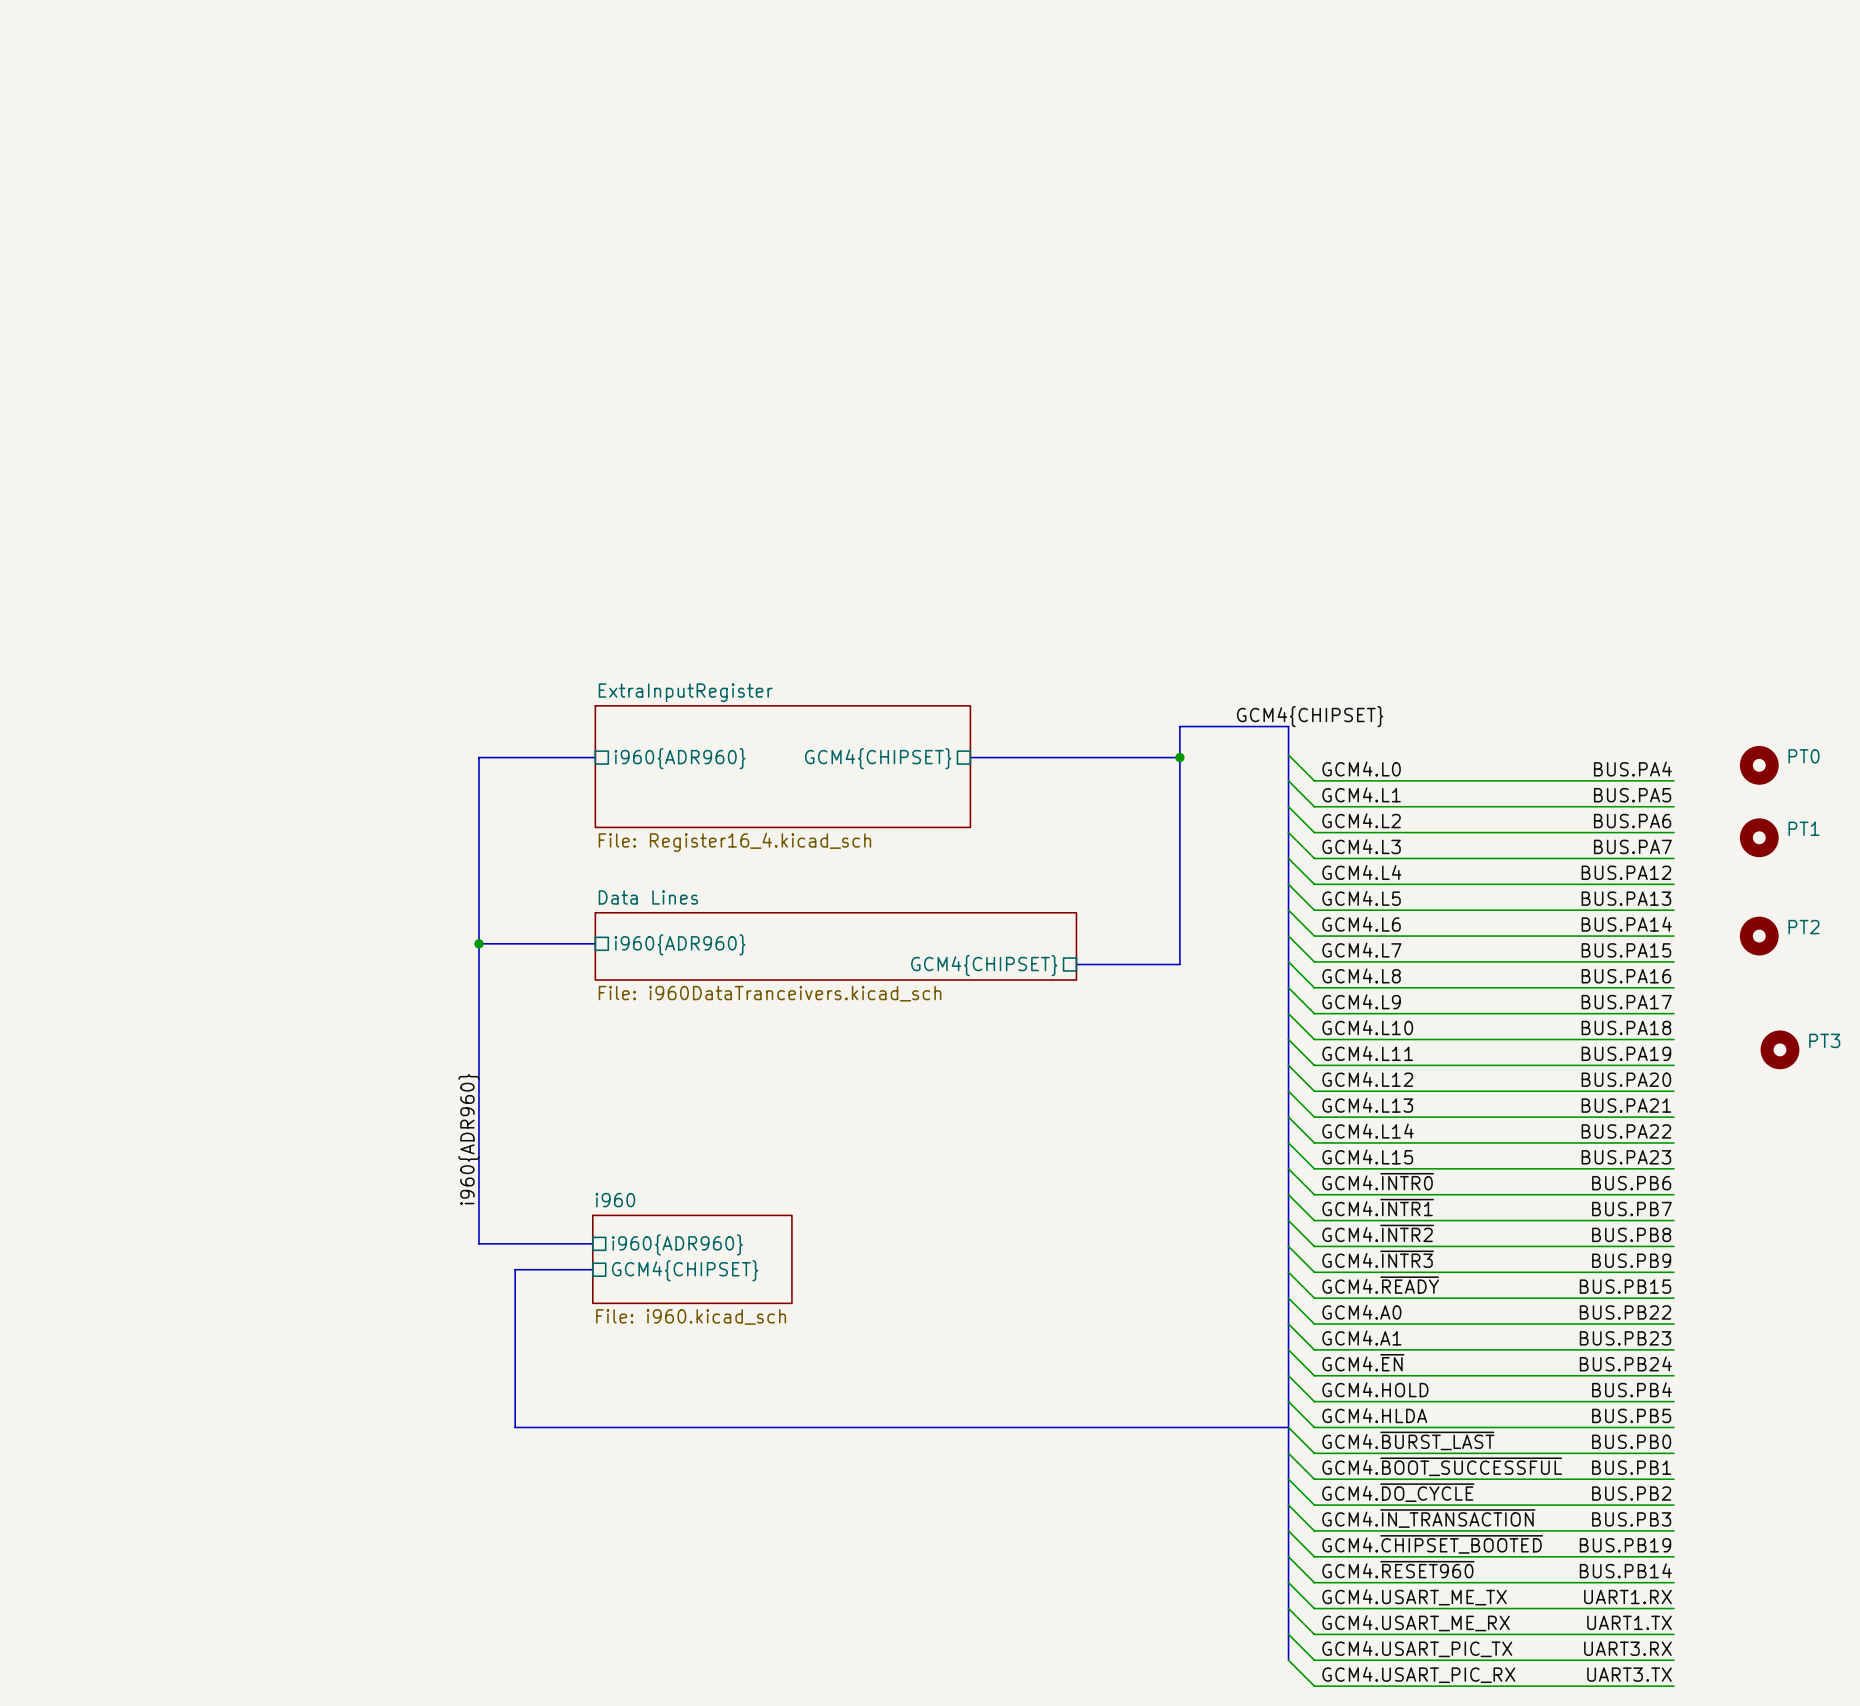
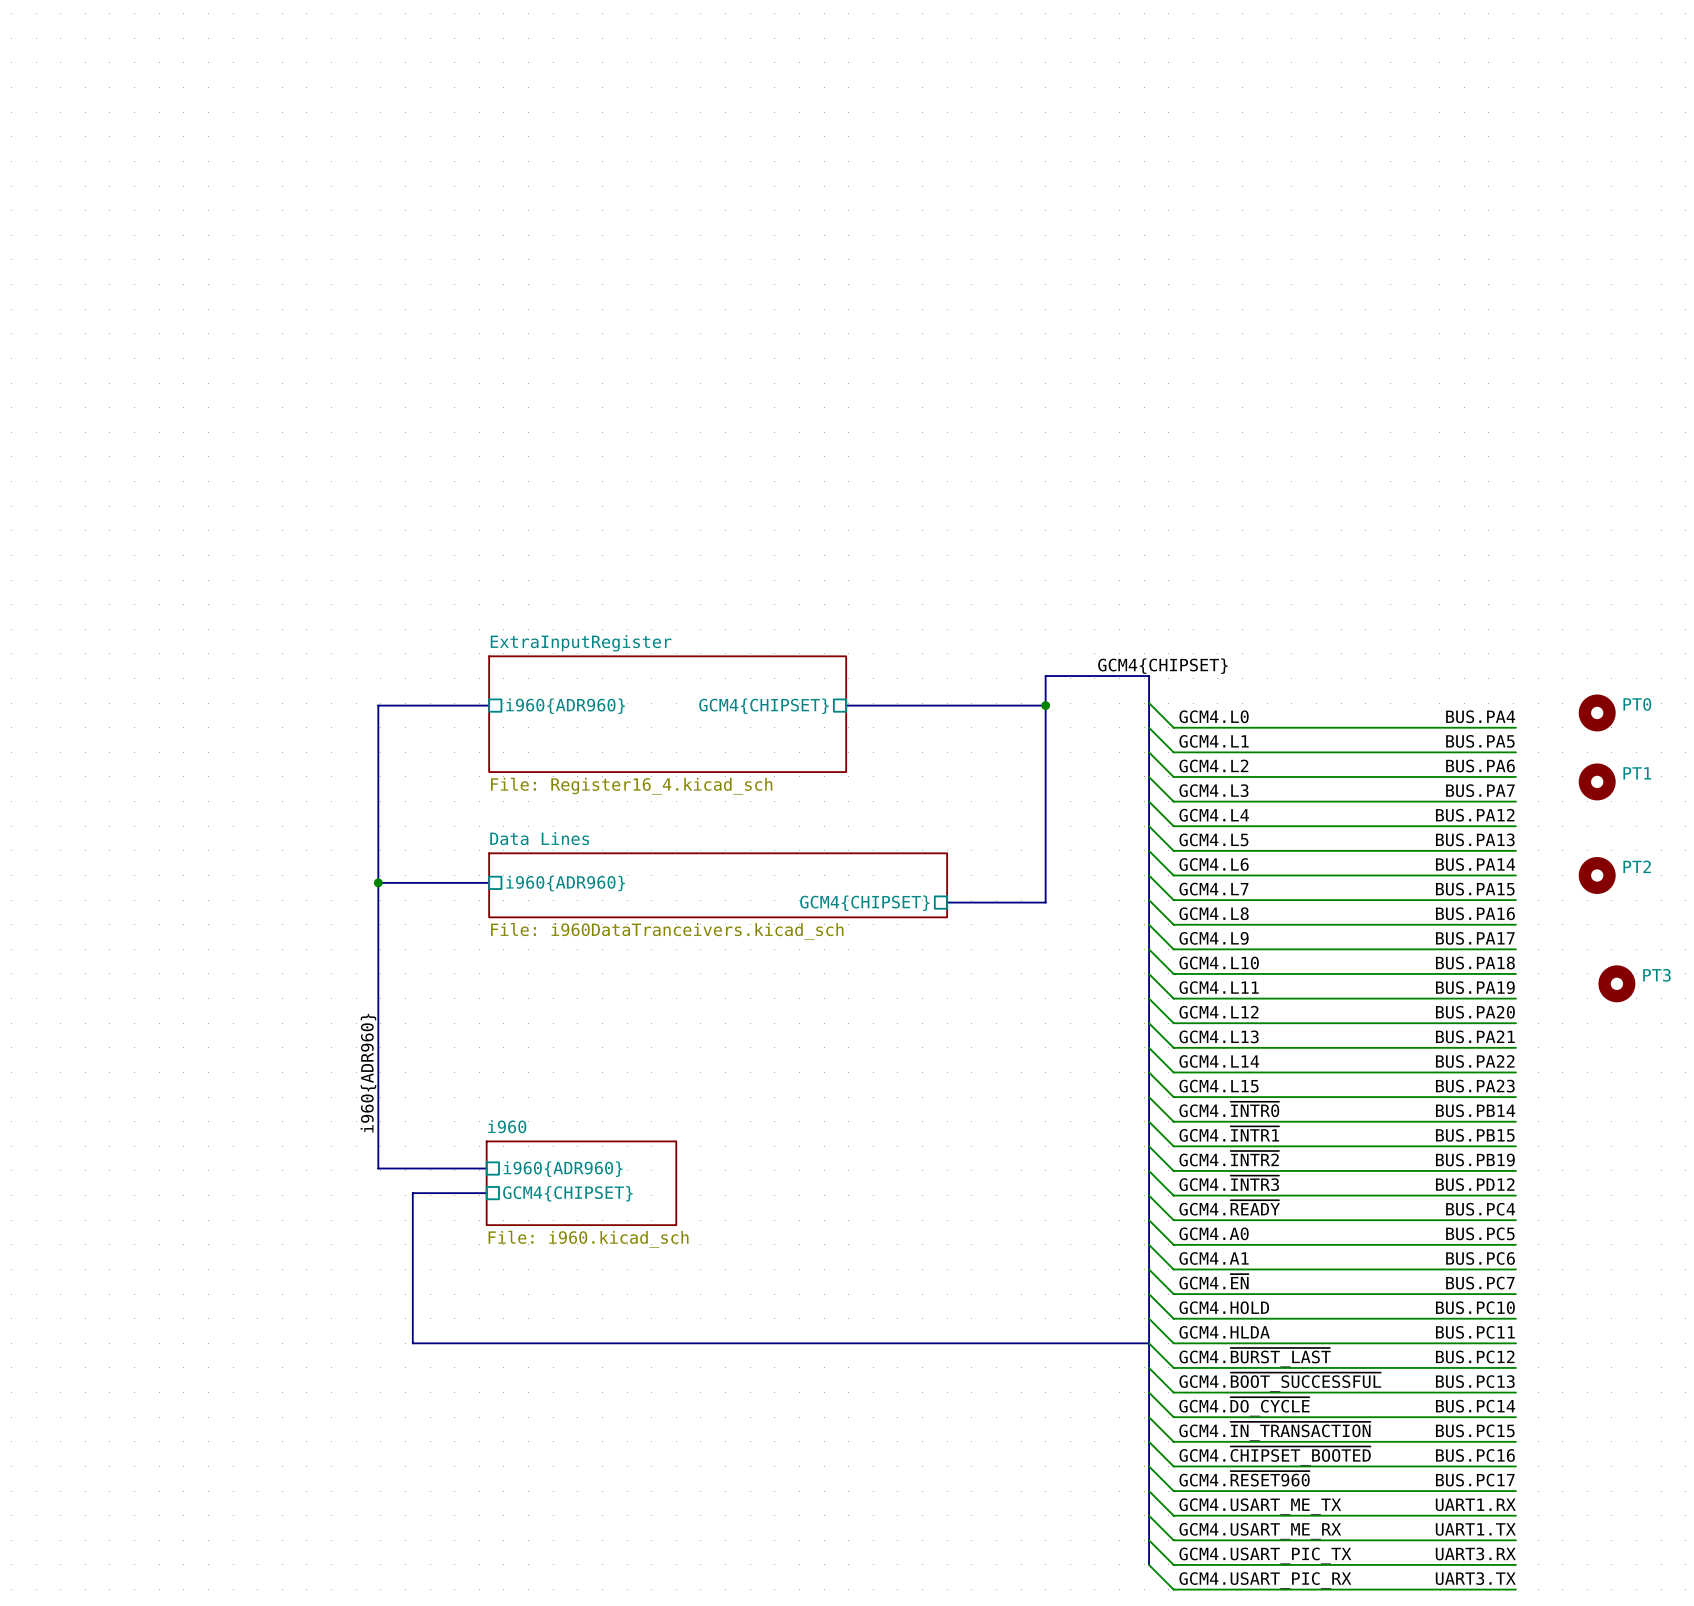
label: BUS.PB6 (1631, 1183) -> BUS.PB14 (1475, 1110)
label: BUS.PB7 (1631, 1209) -> BUS.PB15 (1475, 1135)
label: BUS.PB8 (1631, 1234) -> BUS.PB19 (1475, 1159)
label: BUS.PB9 (1631, 1260) -> BUS.PD12 (1475, 1184)
label: BUS.PB15 (1625, 1286) -> BUS.PC4 (1480, 1209)
label: BUS.PB22 (1625, 1312) -> BUS.PC5 (1480, 1233)
label: BUS.PB23 (1625, 1338) -> BUS.PC6 (1480, 1258)
label: BUS.PB24 (1625, 1363) -> BUS.PC7 (1480, 1283)
label: BUS.PB4 (1631, 1389) -> BUS.PC10 (1475, 1307)
label: BUS.PB5 (1631, 1415) -> BUS.PC11 (1475, 1332)
label: BUS.PB0 (1631, 1441) -> BUS.PC12 (1475, 1356)
label: BUS.PB1 (1631, 1467) -> BUS.PC13 (1475, 1381)
label: BUS.PB2 (1631, 1493) -> BUS.PC14 (1475, 1406)
label: BUS.PB3 (1631, 1519) -> BUS.PC15 (1475, 1430)
label: BUS.PB19 (1625, 1545) -> BUS.PC16 (1475, 1455)
label: BUS.PB14 (1625, 1570) -> BUS.PC17 (1475, 1480)

